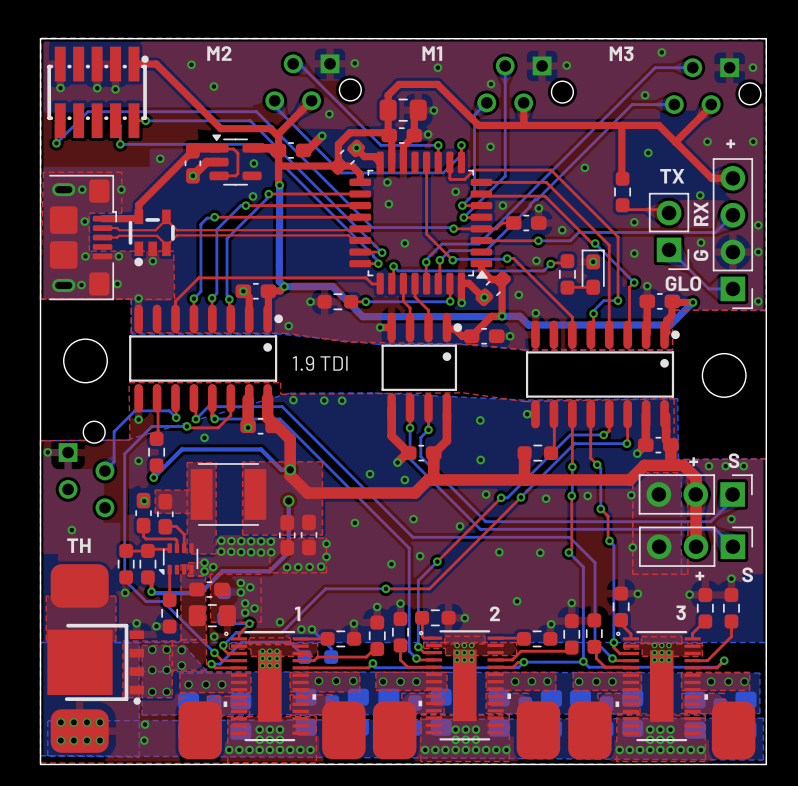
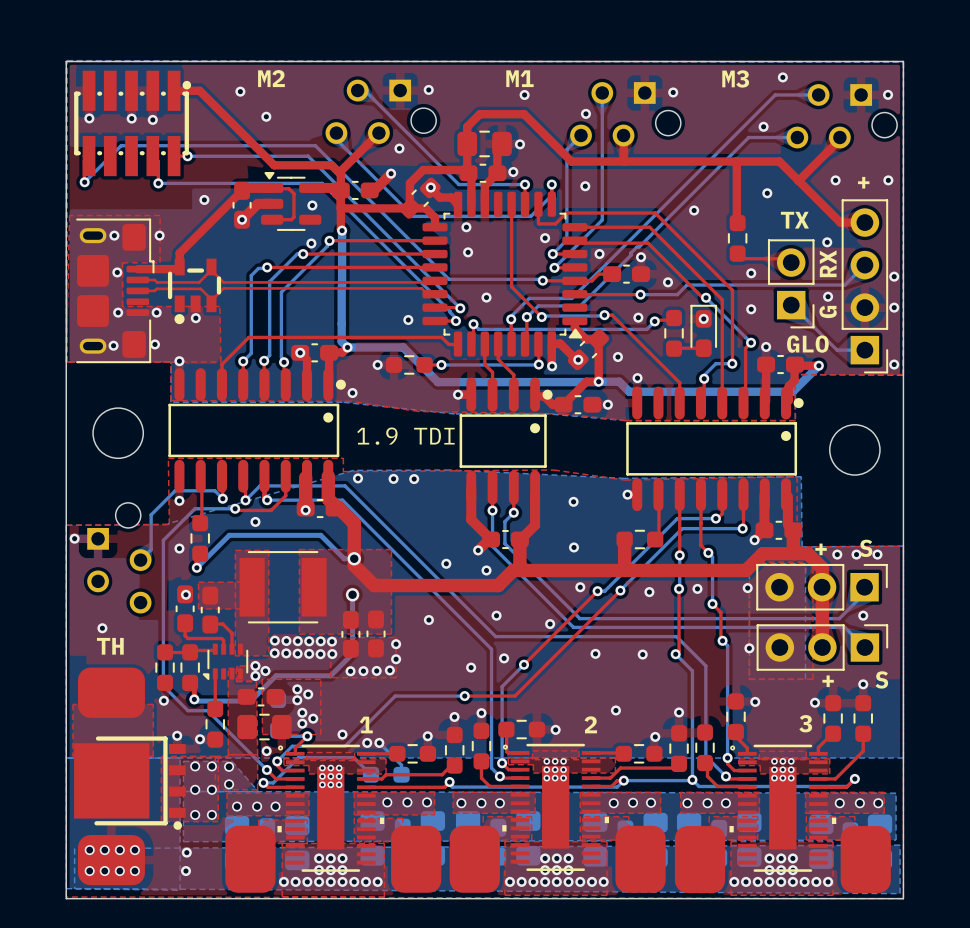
via: none -> (408, 320)

